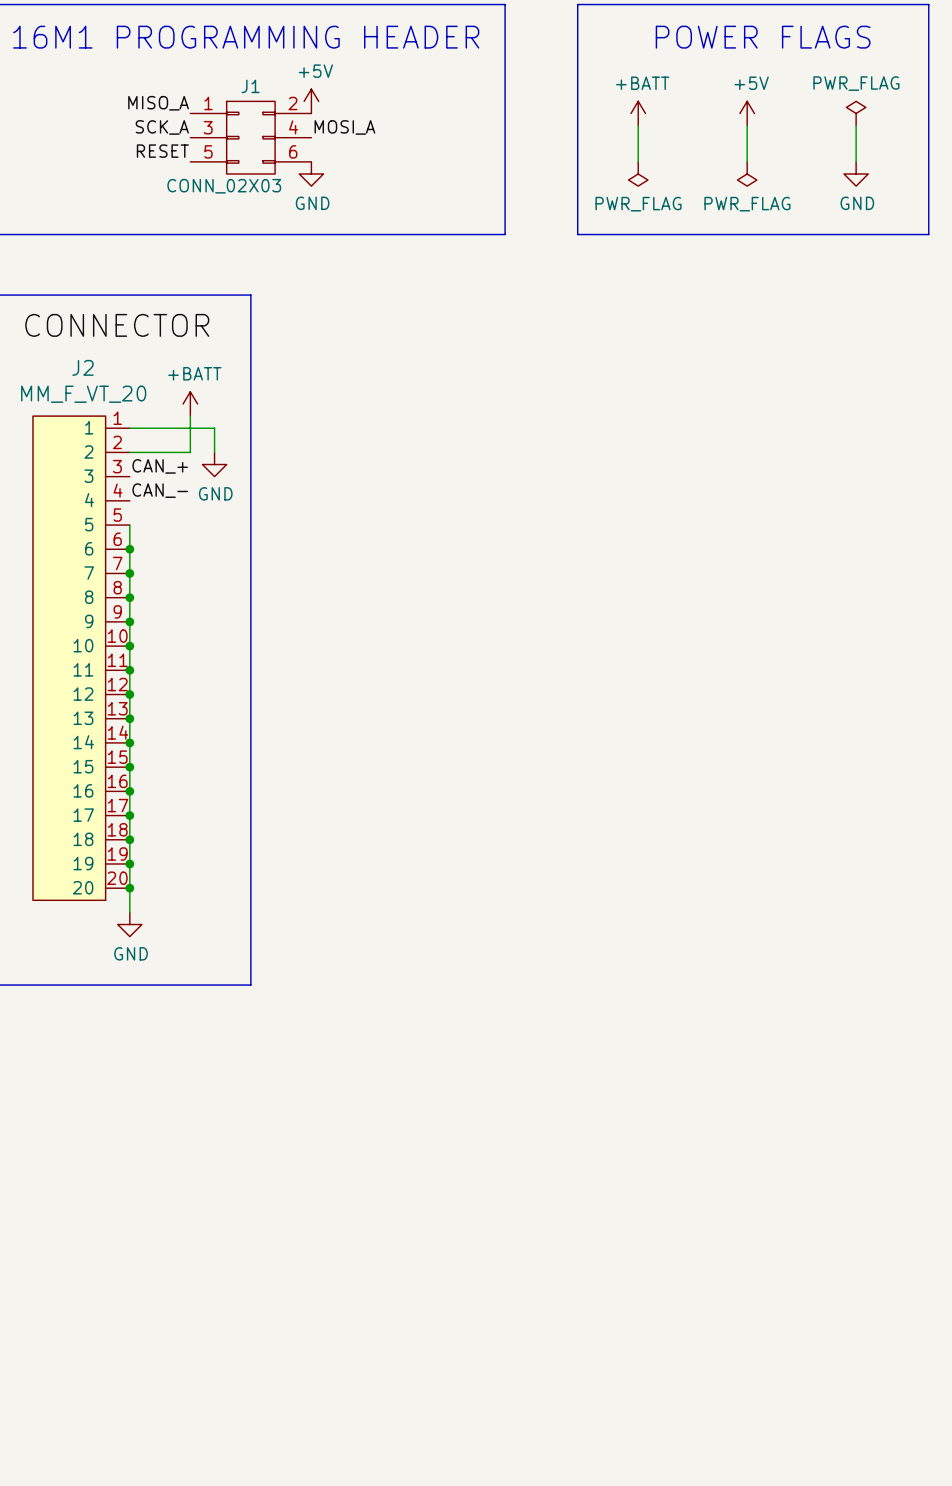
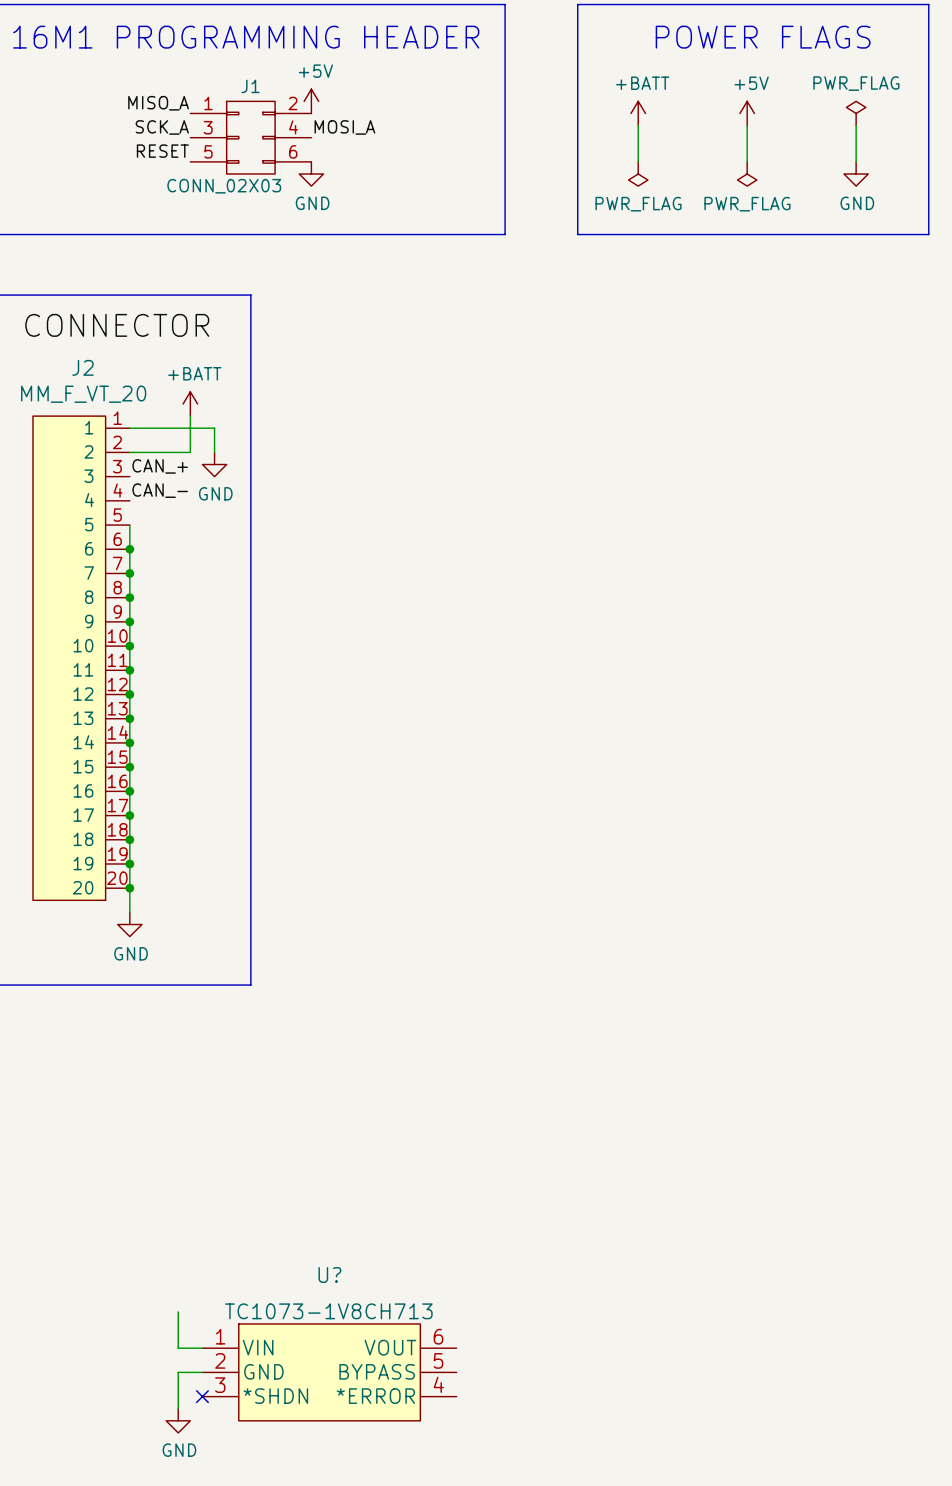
wire: none -> (178, 1311) (178, 1348) (202, 1348)
wire: none -> (202, 1372) (178, 1372) (178, 1408)
U?: none -> TC1073-1V8CH713 (329, 1372)
no-connect mark: none -> (202, 1396)
power symbol: none -> GND (178, 1420)

